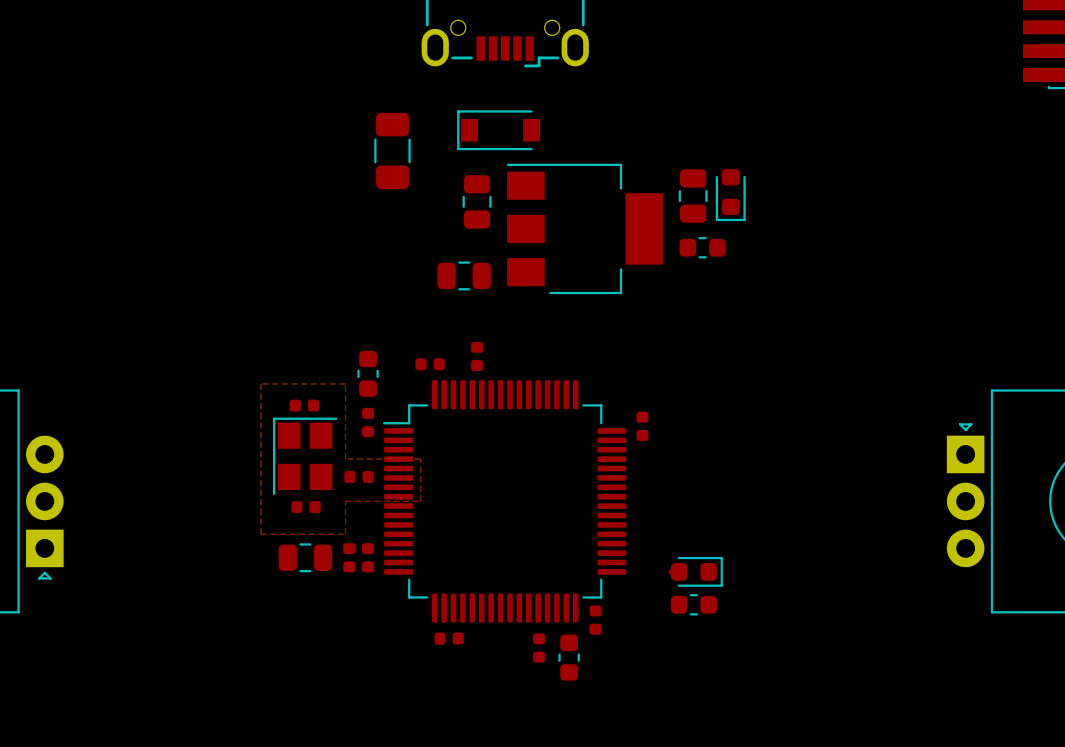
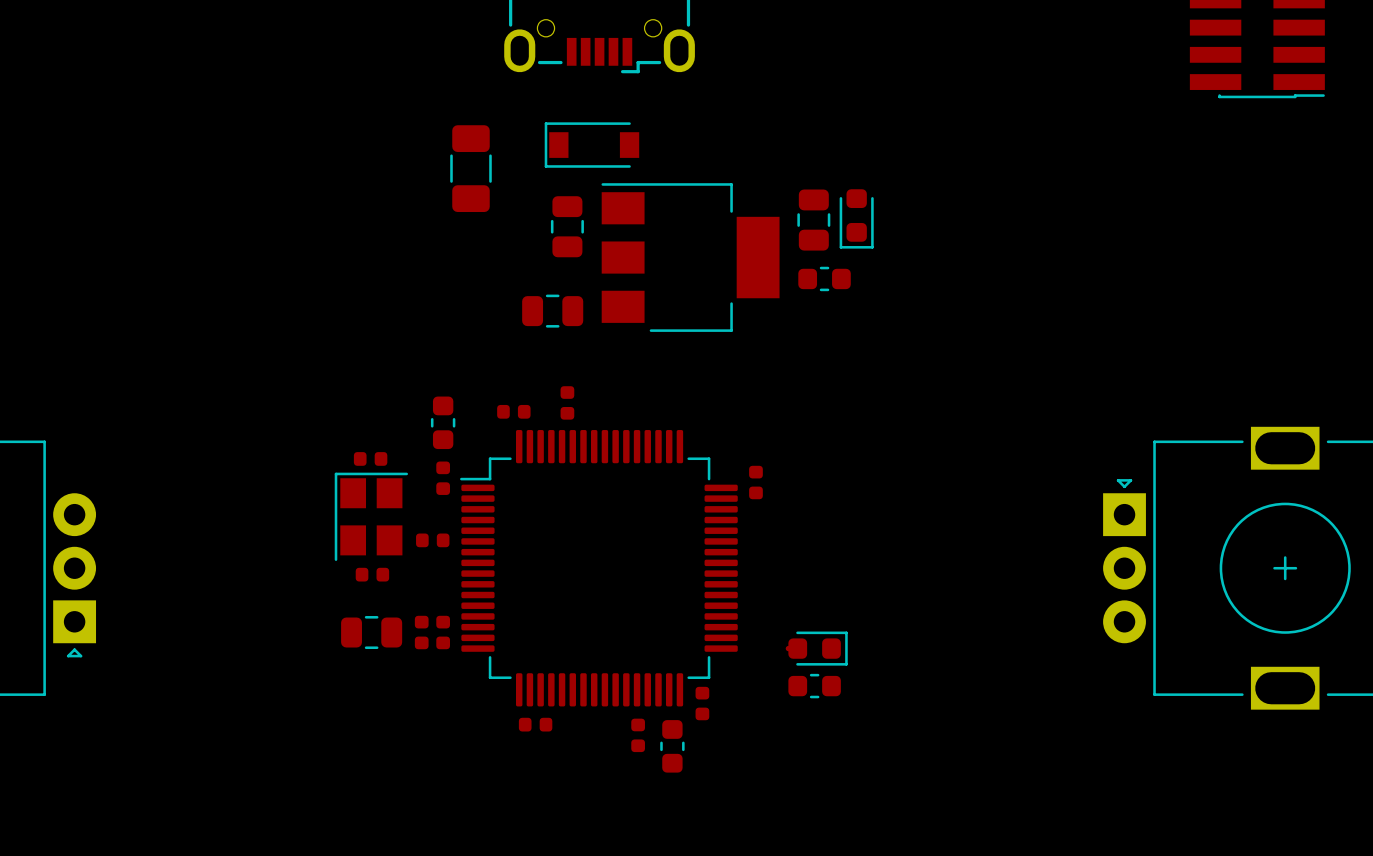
top zone outline: (260, 383) (345, 383) (345, 459) (420, 459) (420, 501) (345, 501) (345, 534) (260, 534) (260, 383) -> none

